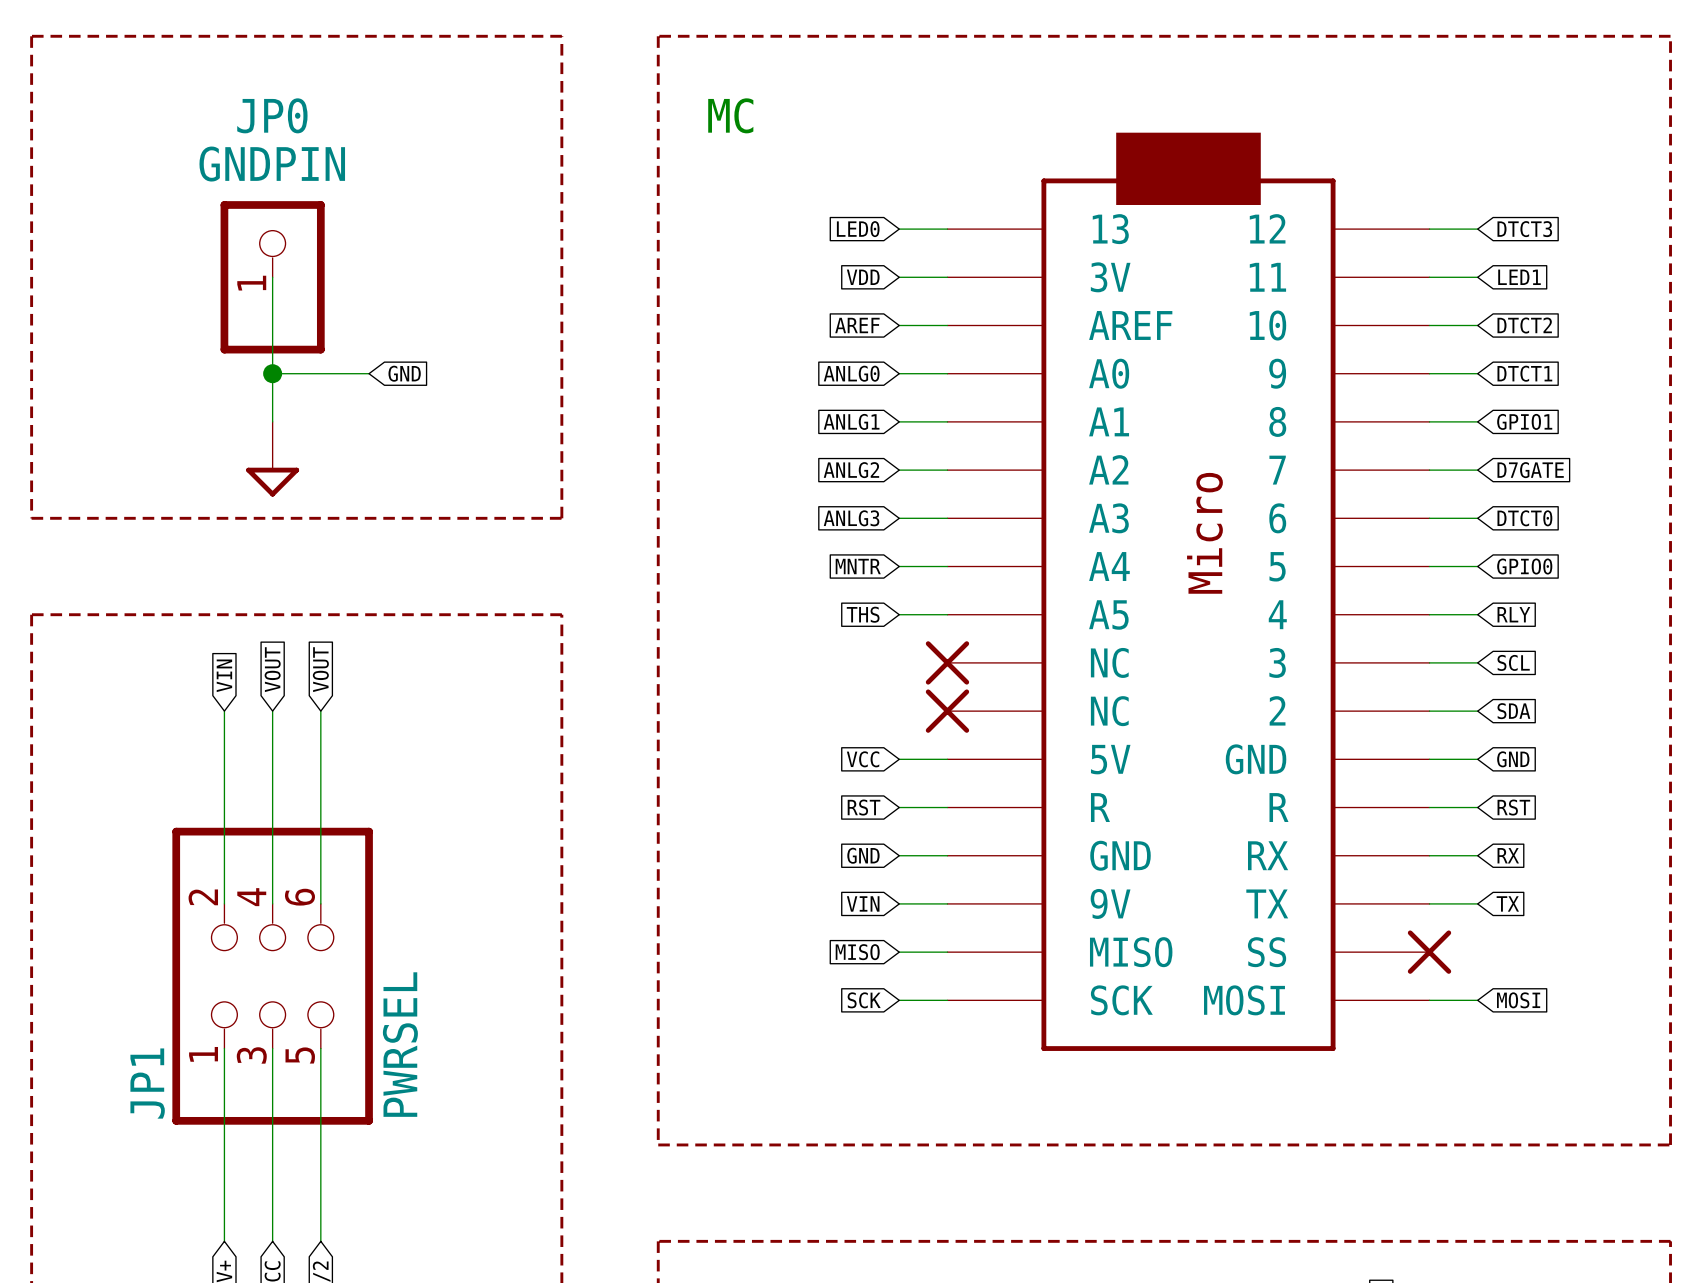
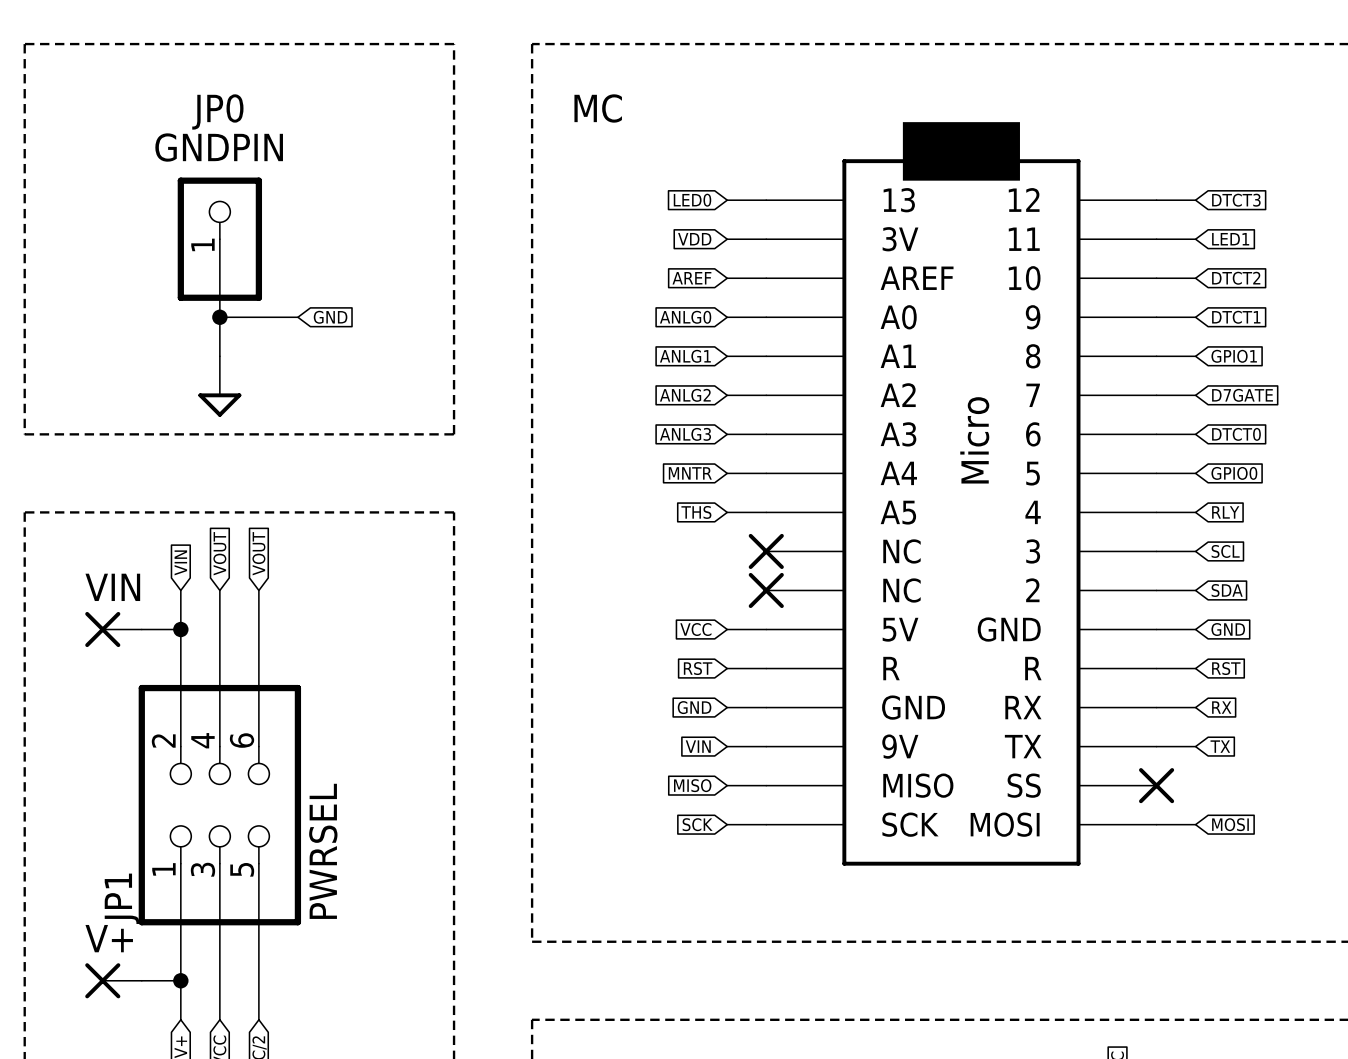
VIN: none -> (113, 629)
wire: none -> (141, 629) (180, 629)
junction: none -> (180, 629)
V+: none -> (113, 980)
wire: none -> (141, 980) (180, 980)
junction: none -> (180, 980)

